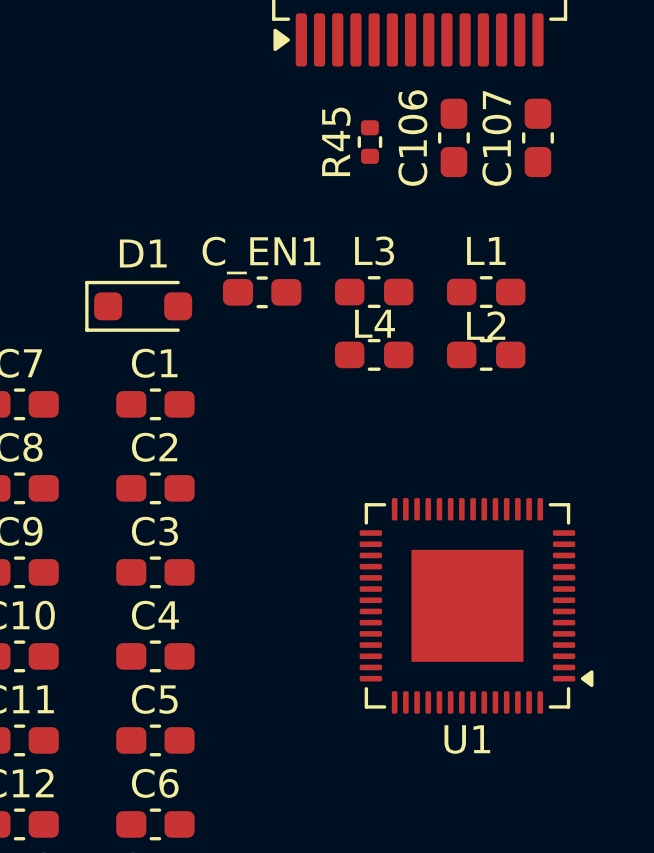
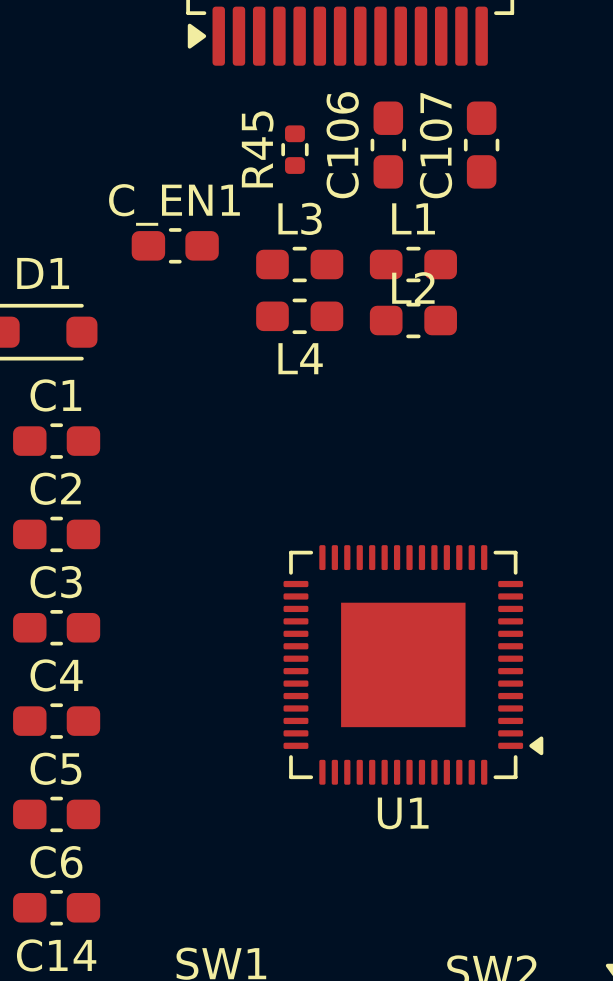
L3: none -> (299, 264)
L3 name: L3 (374, 250) -> L4 (300, 358)
C_EN1 position: (262, 292) -> (175, 245)
L1 position: (486, 292) -> (413, 264)
L4: (374, 354) -> none
L2 position: (486, 354) -> (413, 320)

